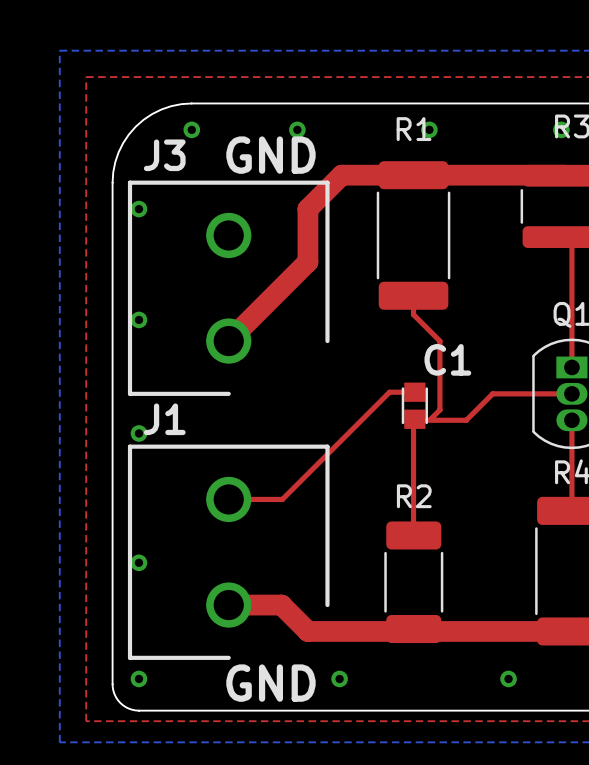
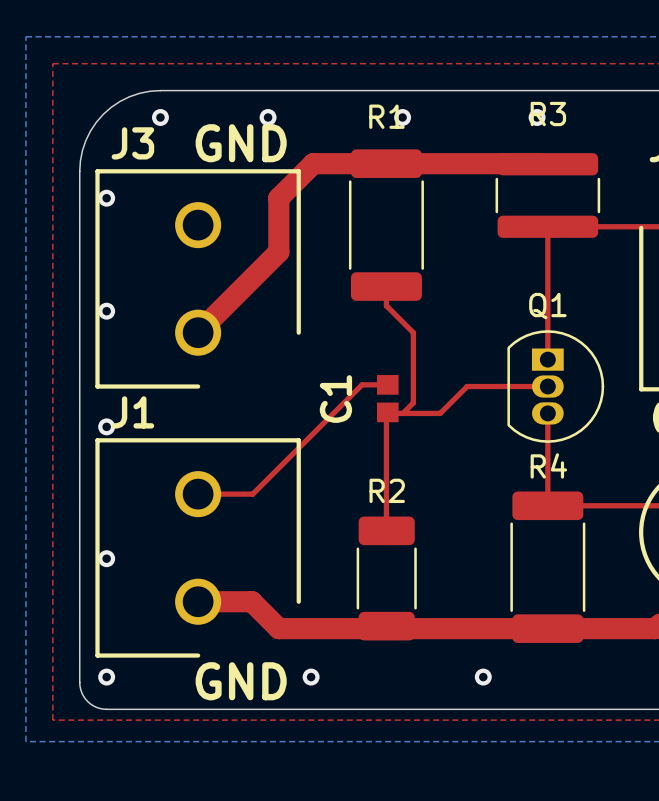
C1 name rotation: 0° (447, 359) -> 90° counterclockwise (335, 399)
C1 name position: C1 (447, 359) -> C1 (335, 399)
line: (402, 388) (402, 422) -> none
line: (426, 388) (426, 422) -> none

